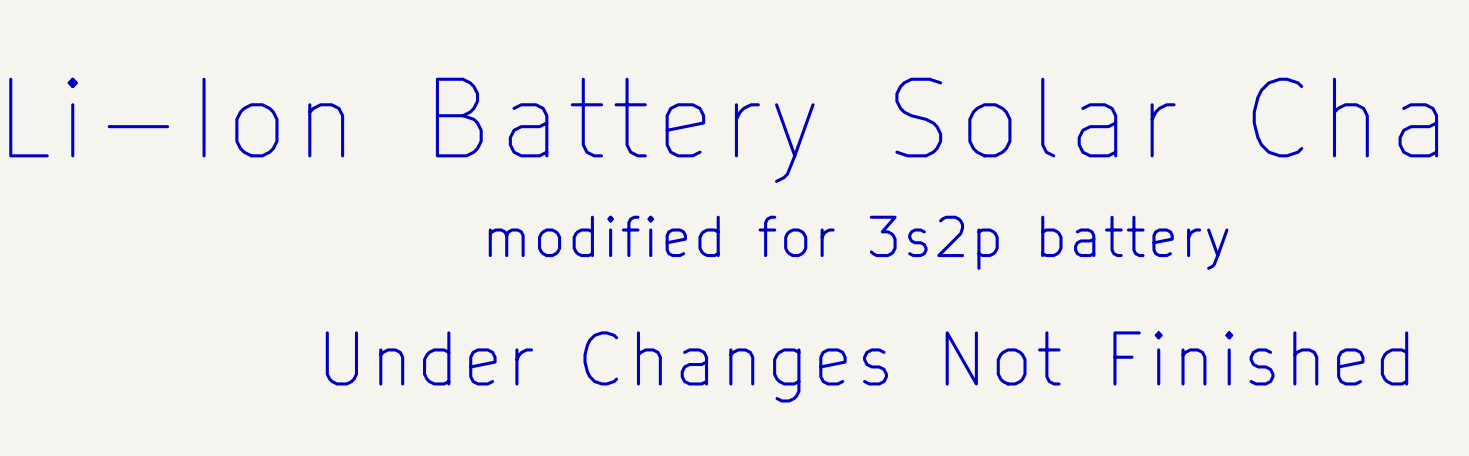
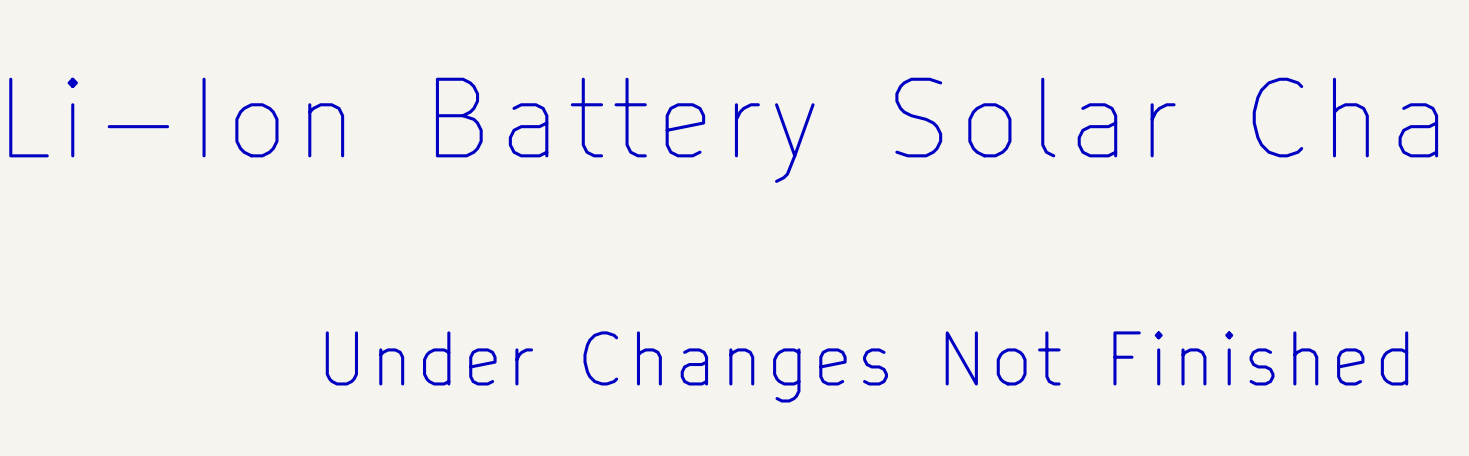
text: modified for 3s2p battery (858, 242) -> none

